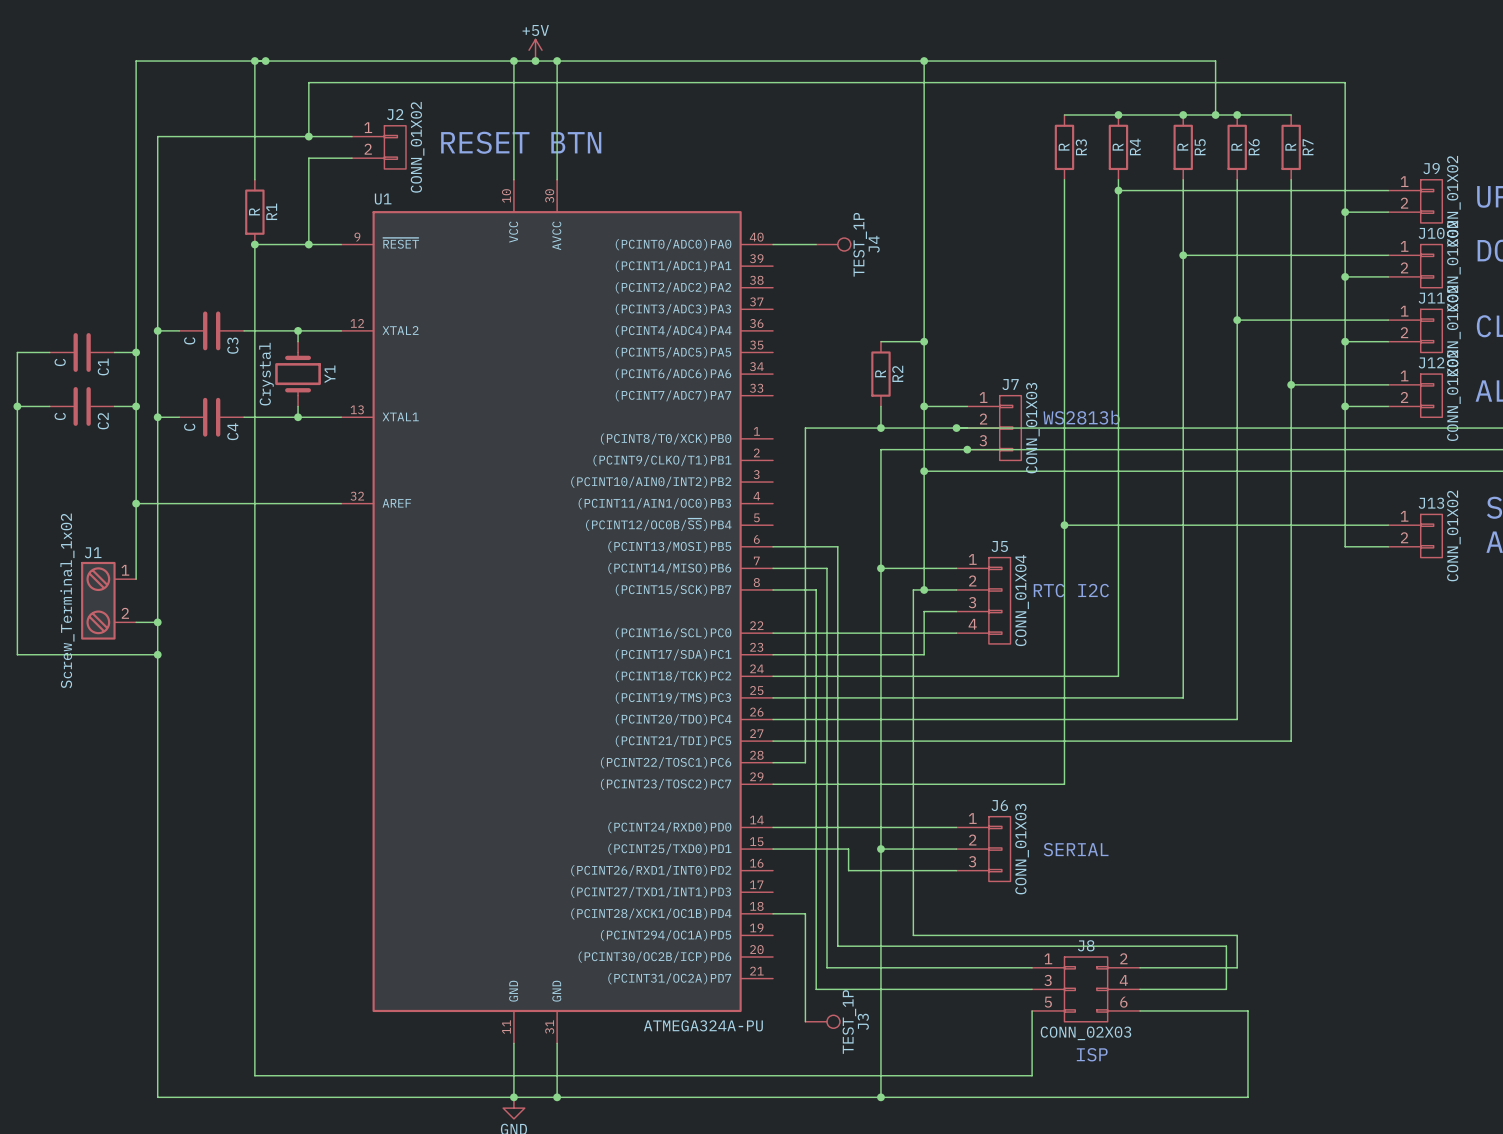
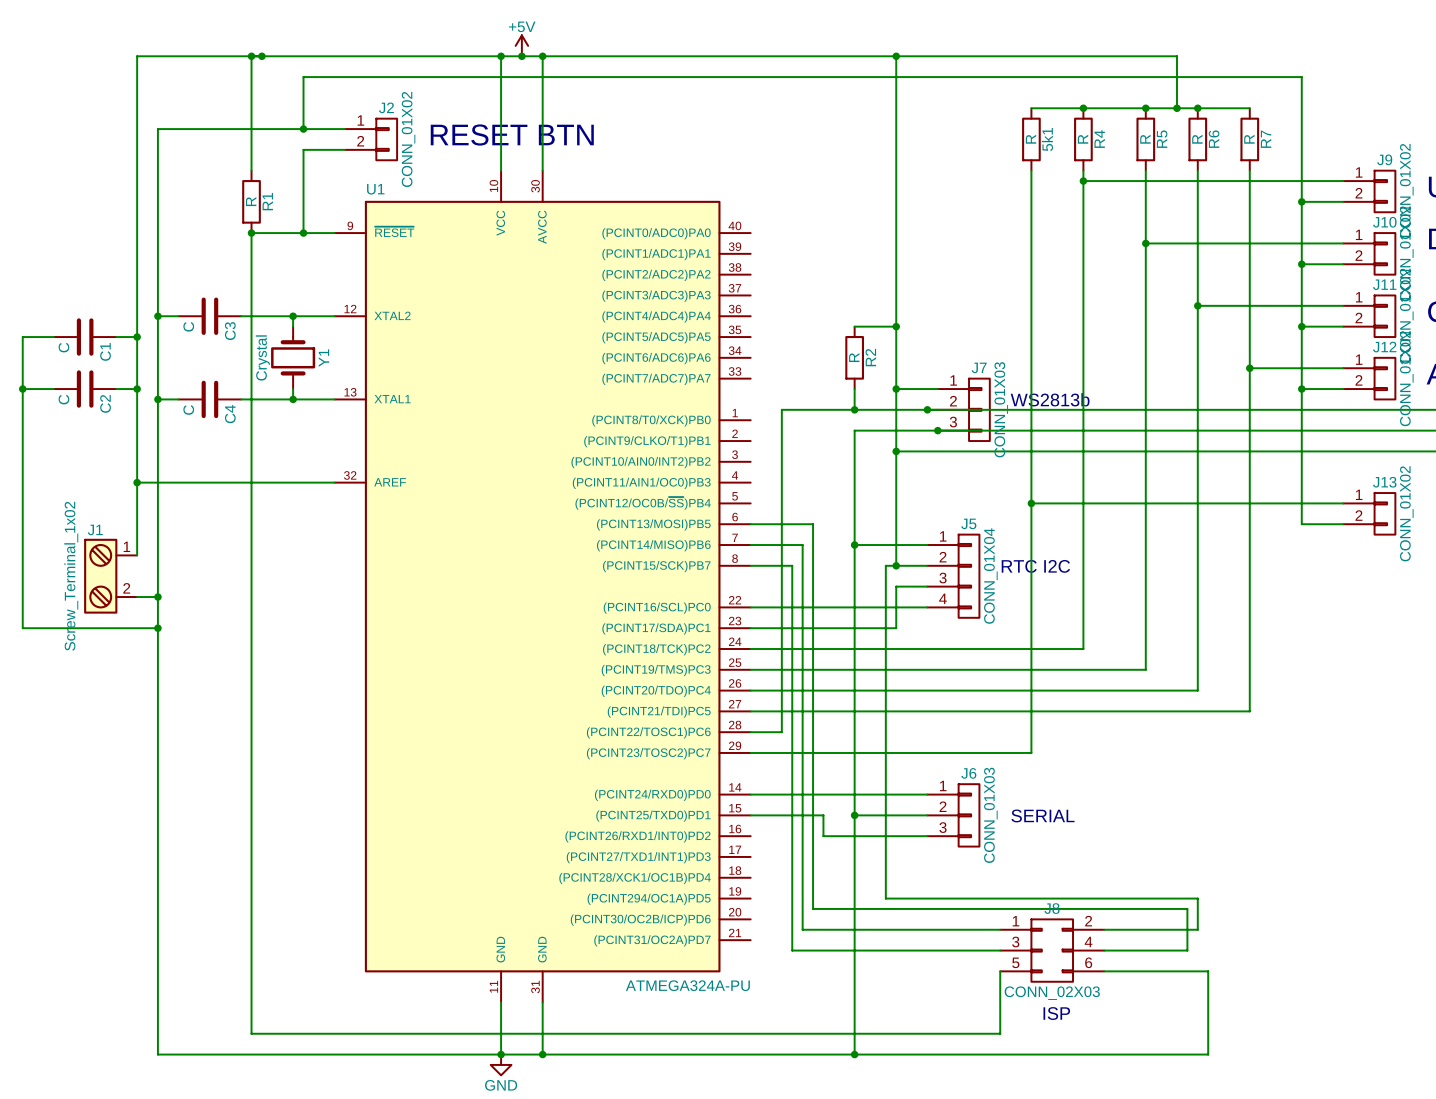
R3 name: R3 (1081, 147) -> 5k1 (1047, 139)
wire: (773, 244) (816, 244) -> none
J4: TEST_1P (833, 244) -> none
wire: (773, 913) (805, 913) (805, 1021) -> none
J3: TEST_1P (822, 1021) -> none

